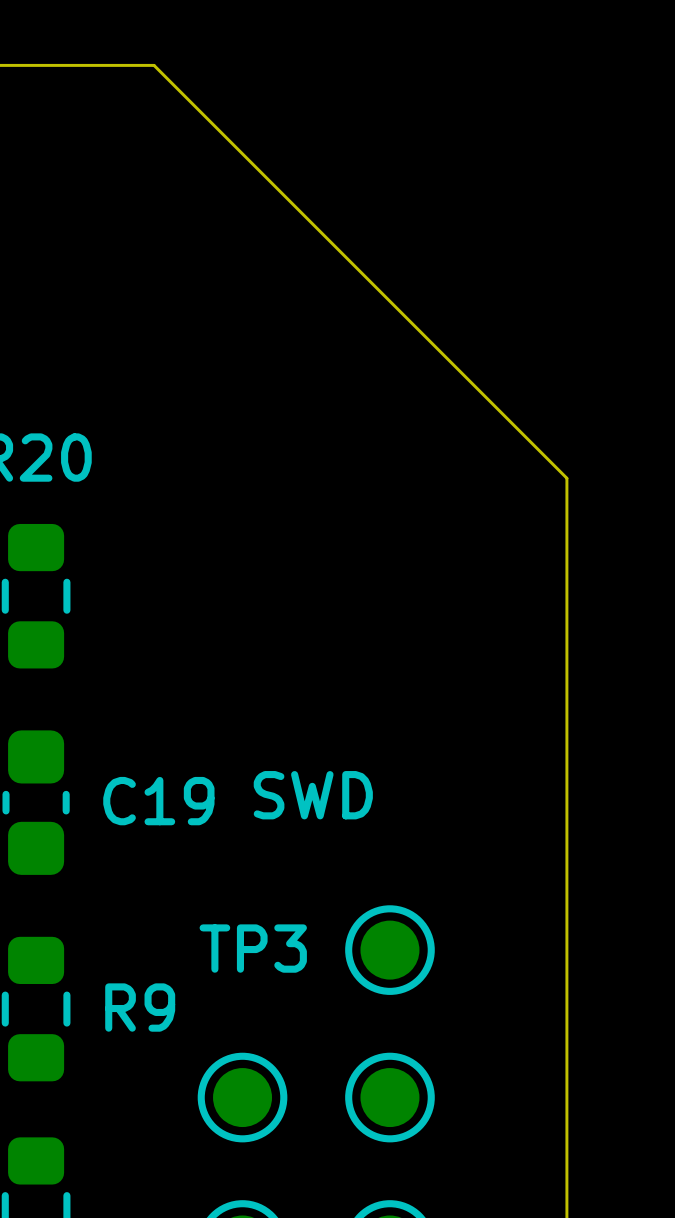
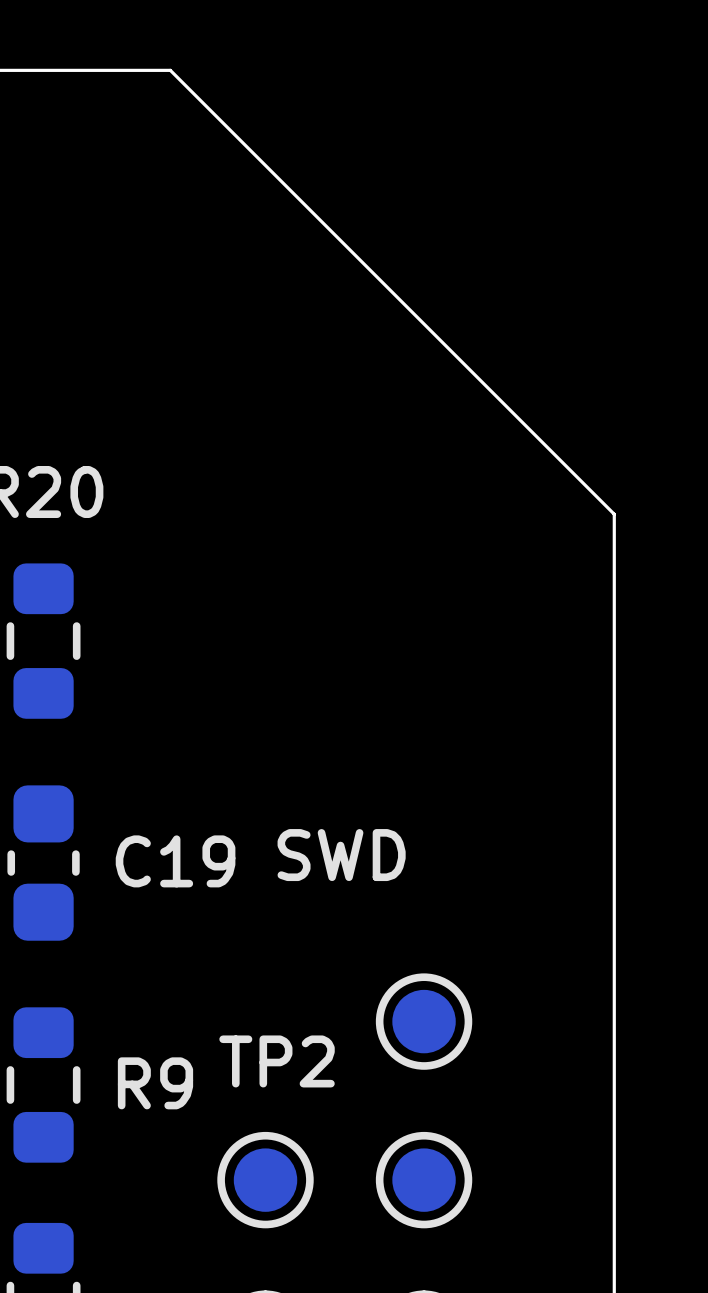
TP3 name: TP3 (253, 948) -> none
TP2 name: none -> TP2 (277, 1061)

